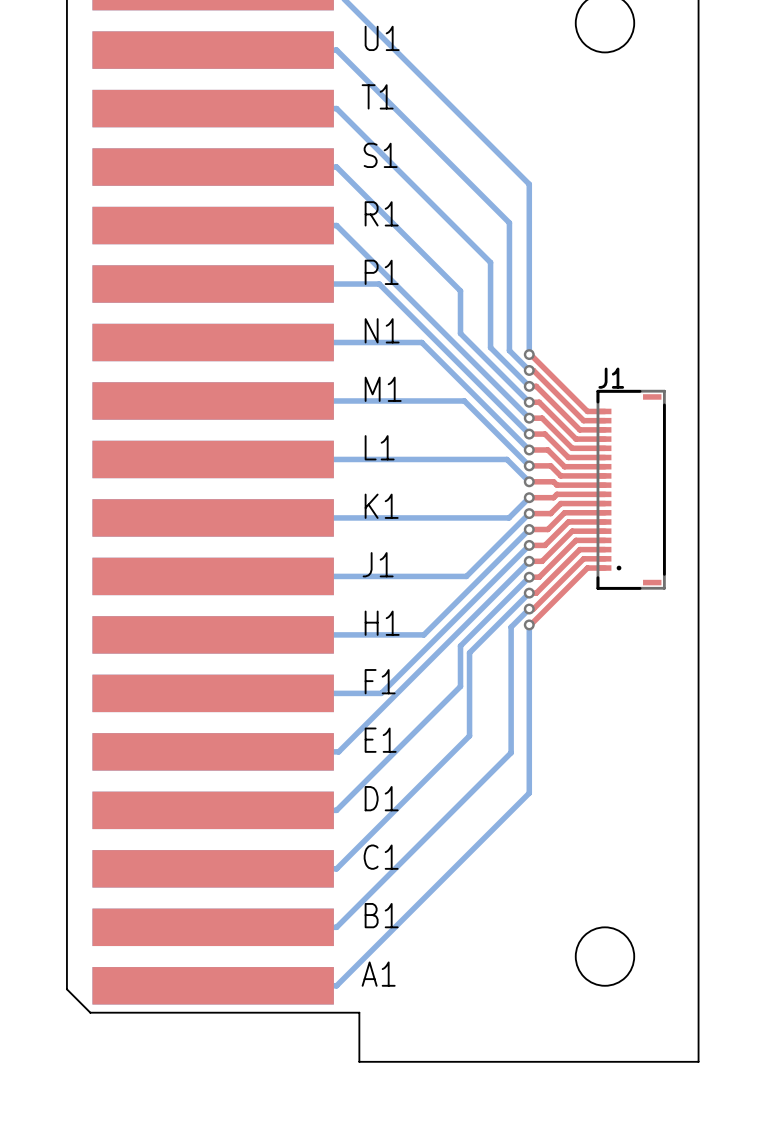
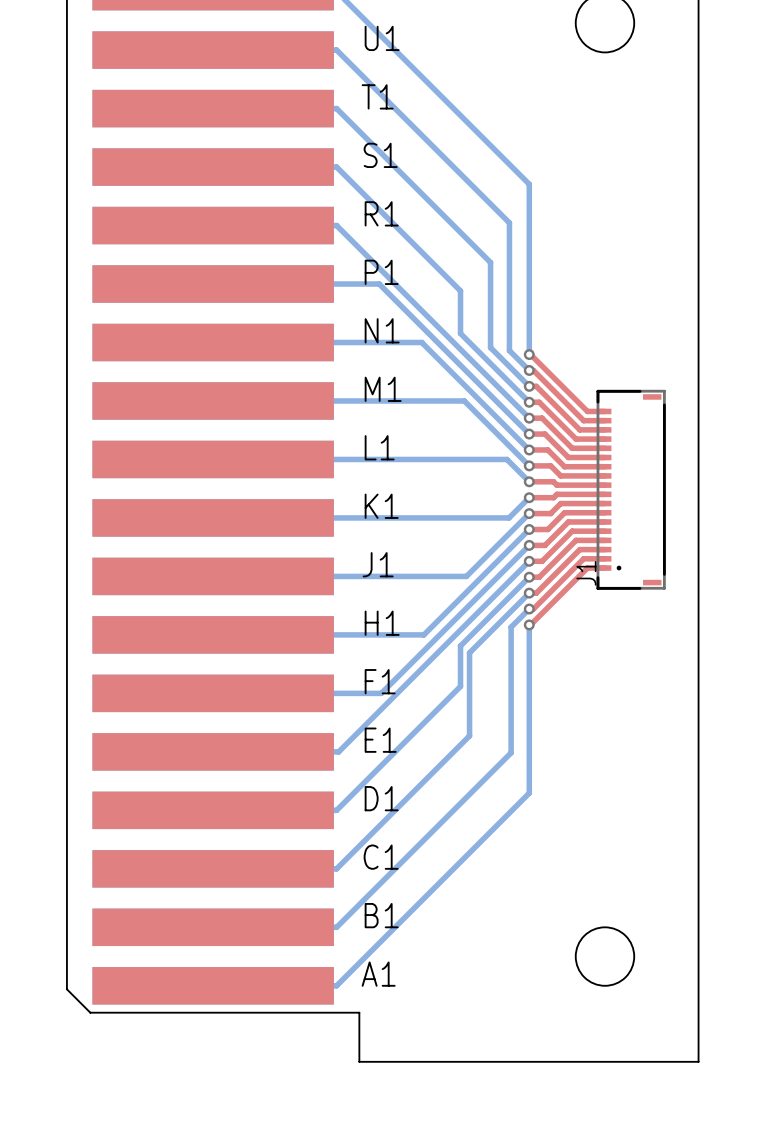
J1 name rotation: 0° (611, 378) -> 90° counterclockwise (586, 573)
J1 name position: J1 (611, 378) -> J1 (586, 573)

